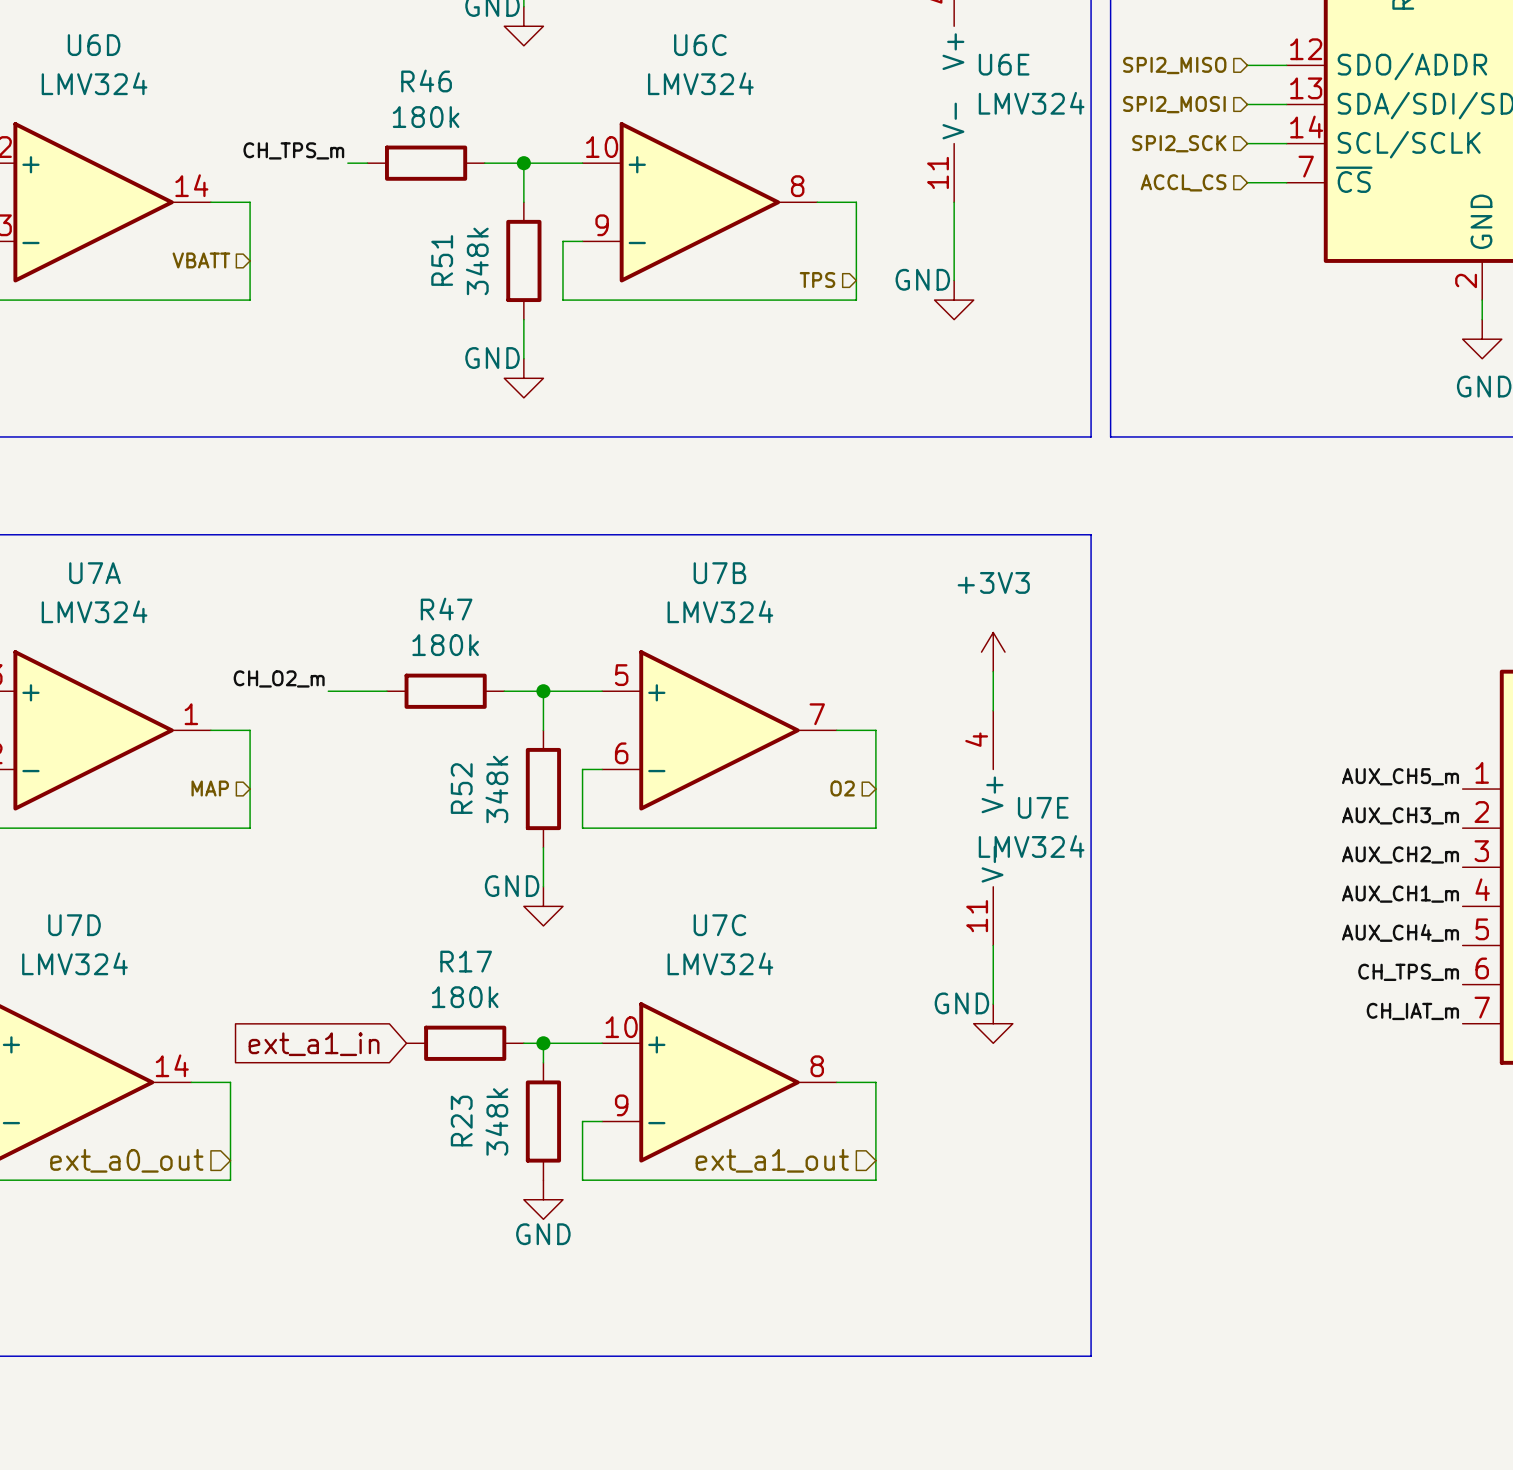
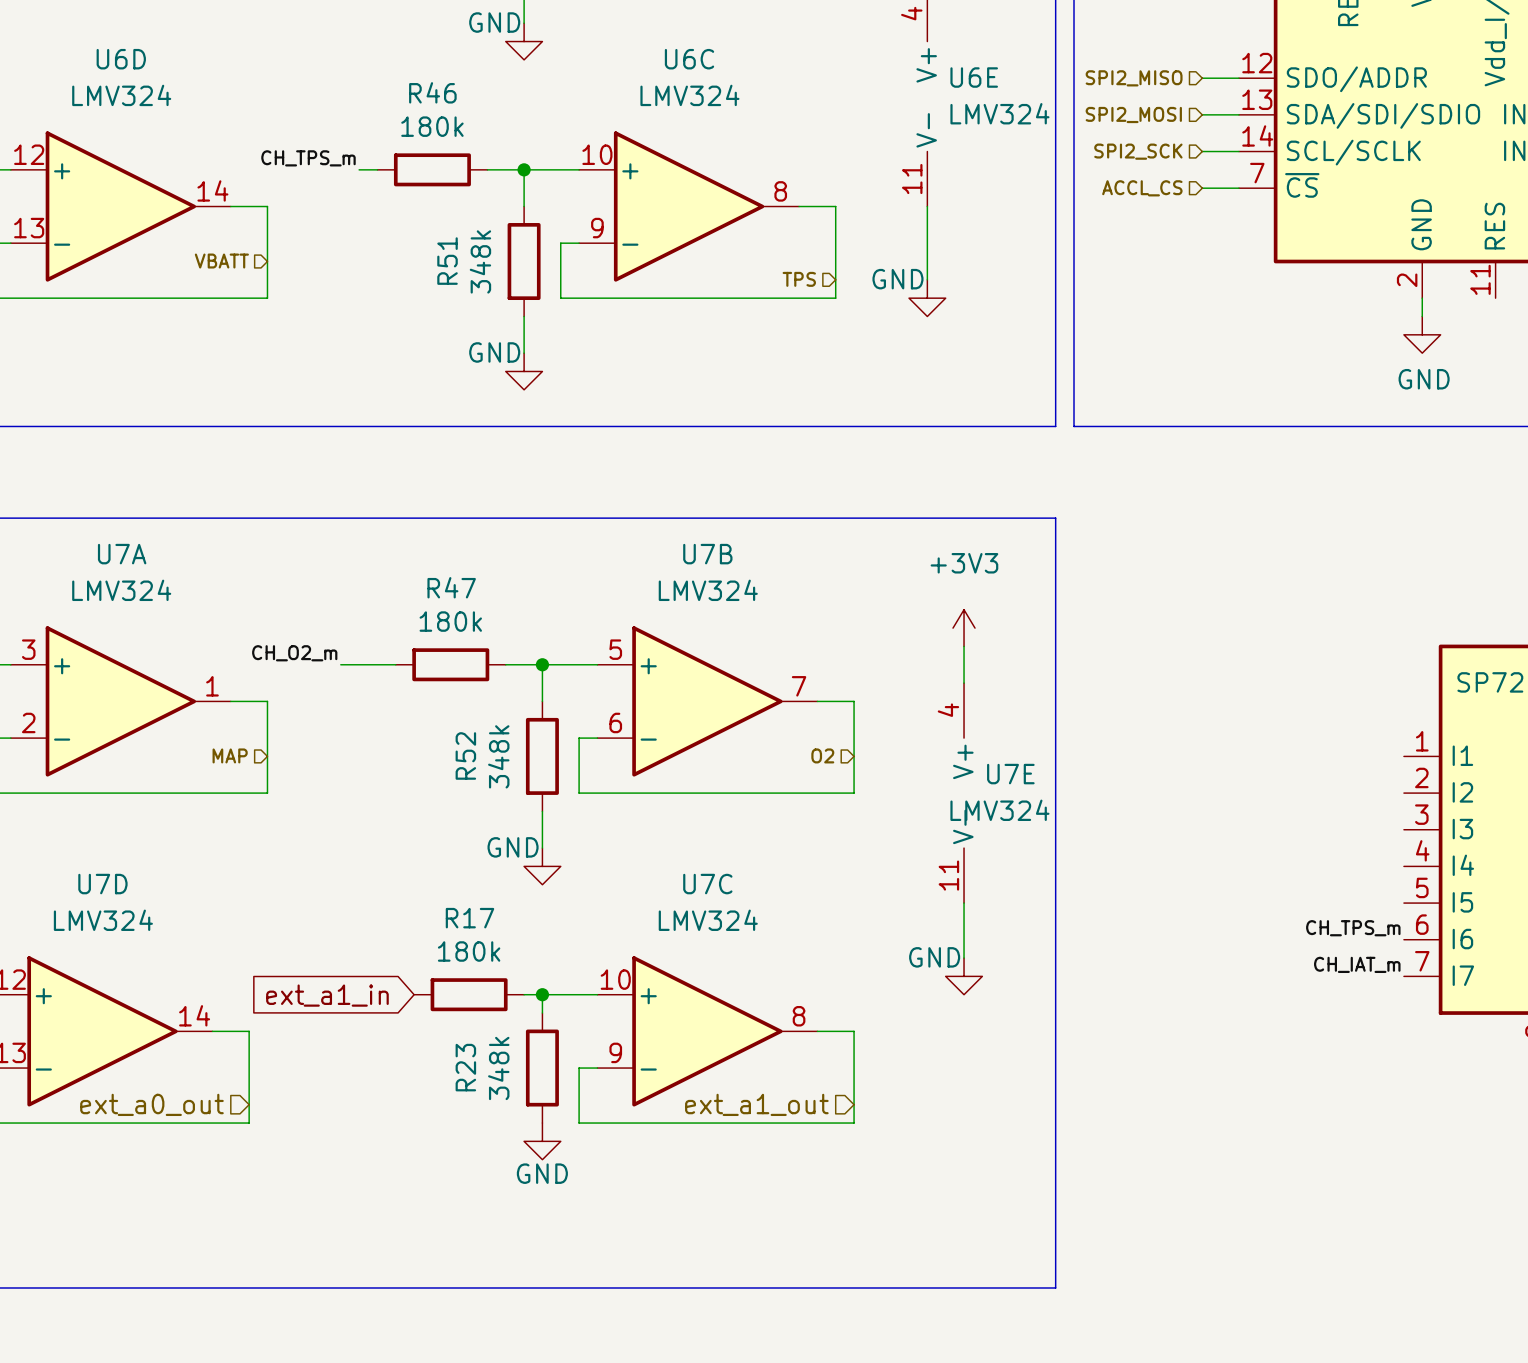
label: AUX_CH5_m (1400, 776) -> none
label: AUX_CH3_m (1400, 815) -> none
label: AUX_CH2_m (1400, 854) -> none
label: AUX_CH1_m (1400, 894) -> none
label: AUX_CH4_m (1400, 932) -> none

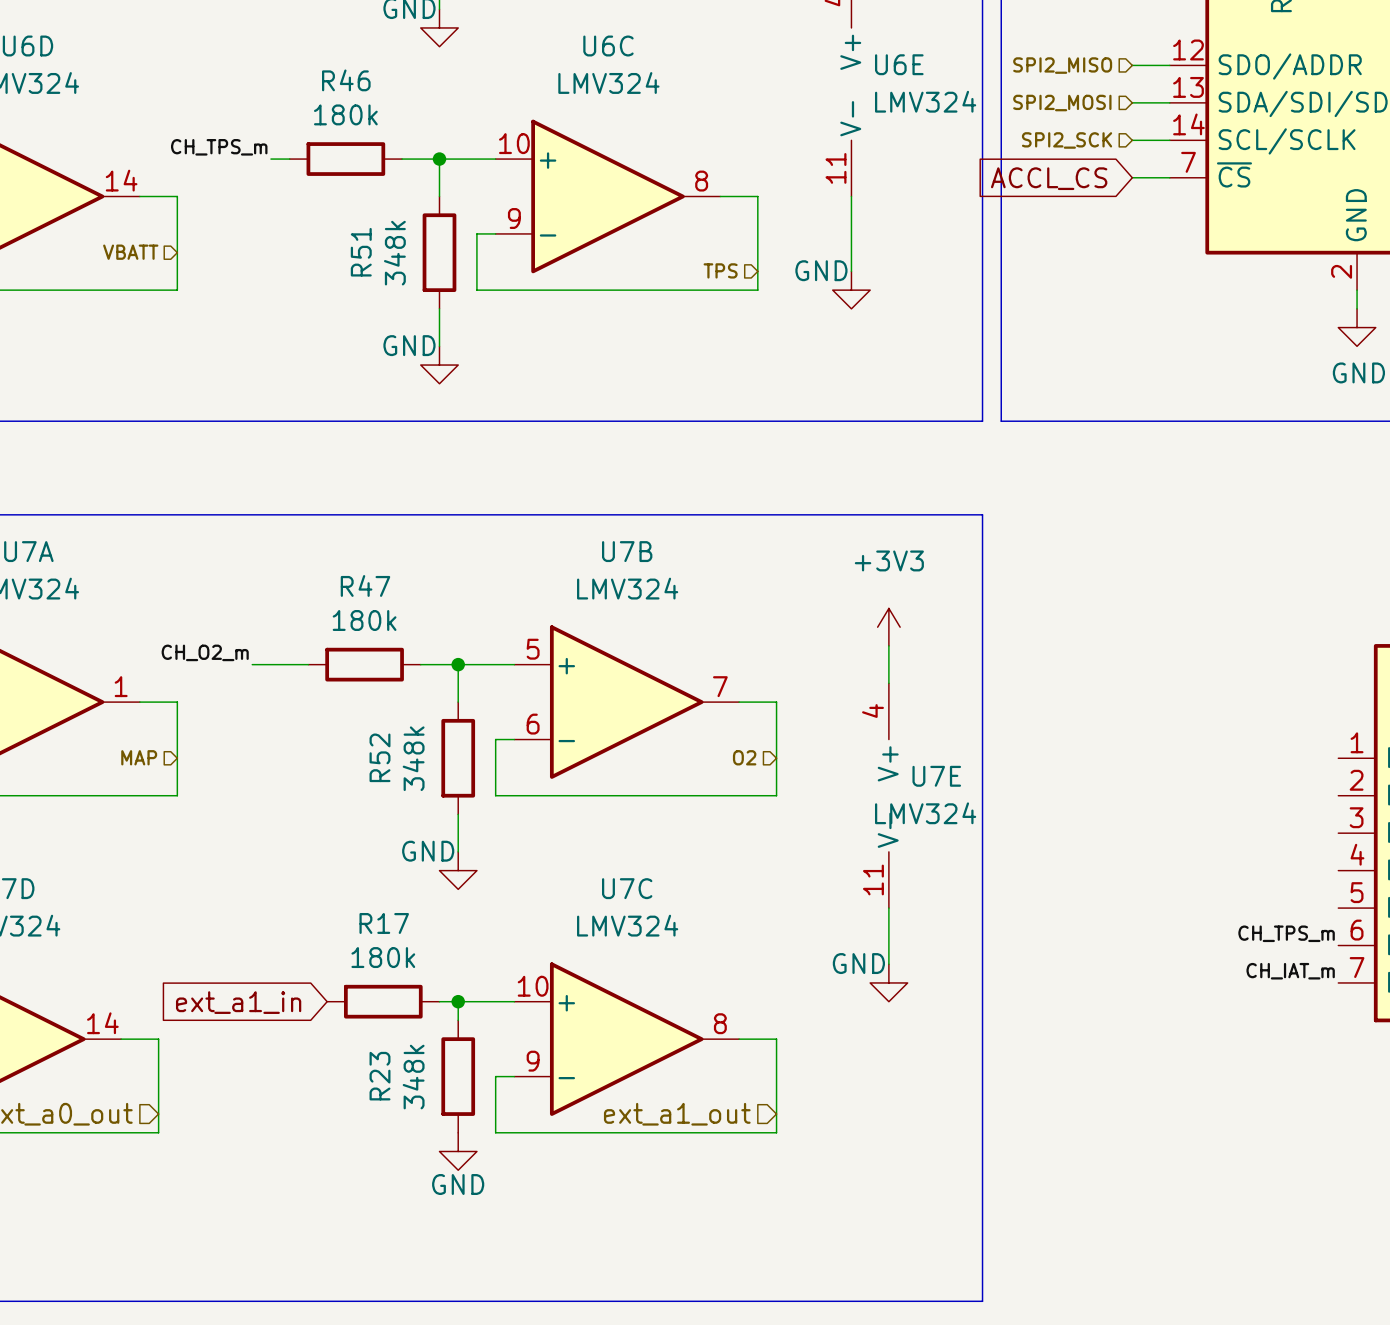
hierarchical label: ACCL_CS (1142, 188) -> none
global label: none -> ACCL_CS (1049, 178)

